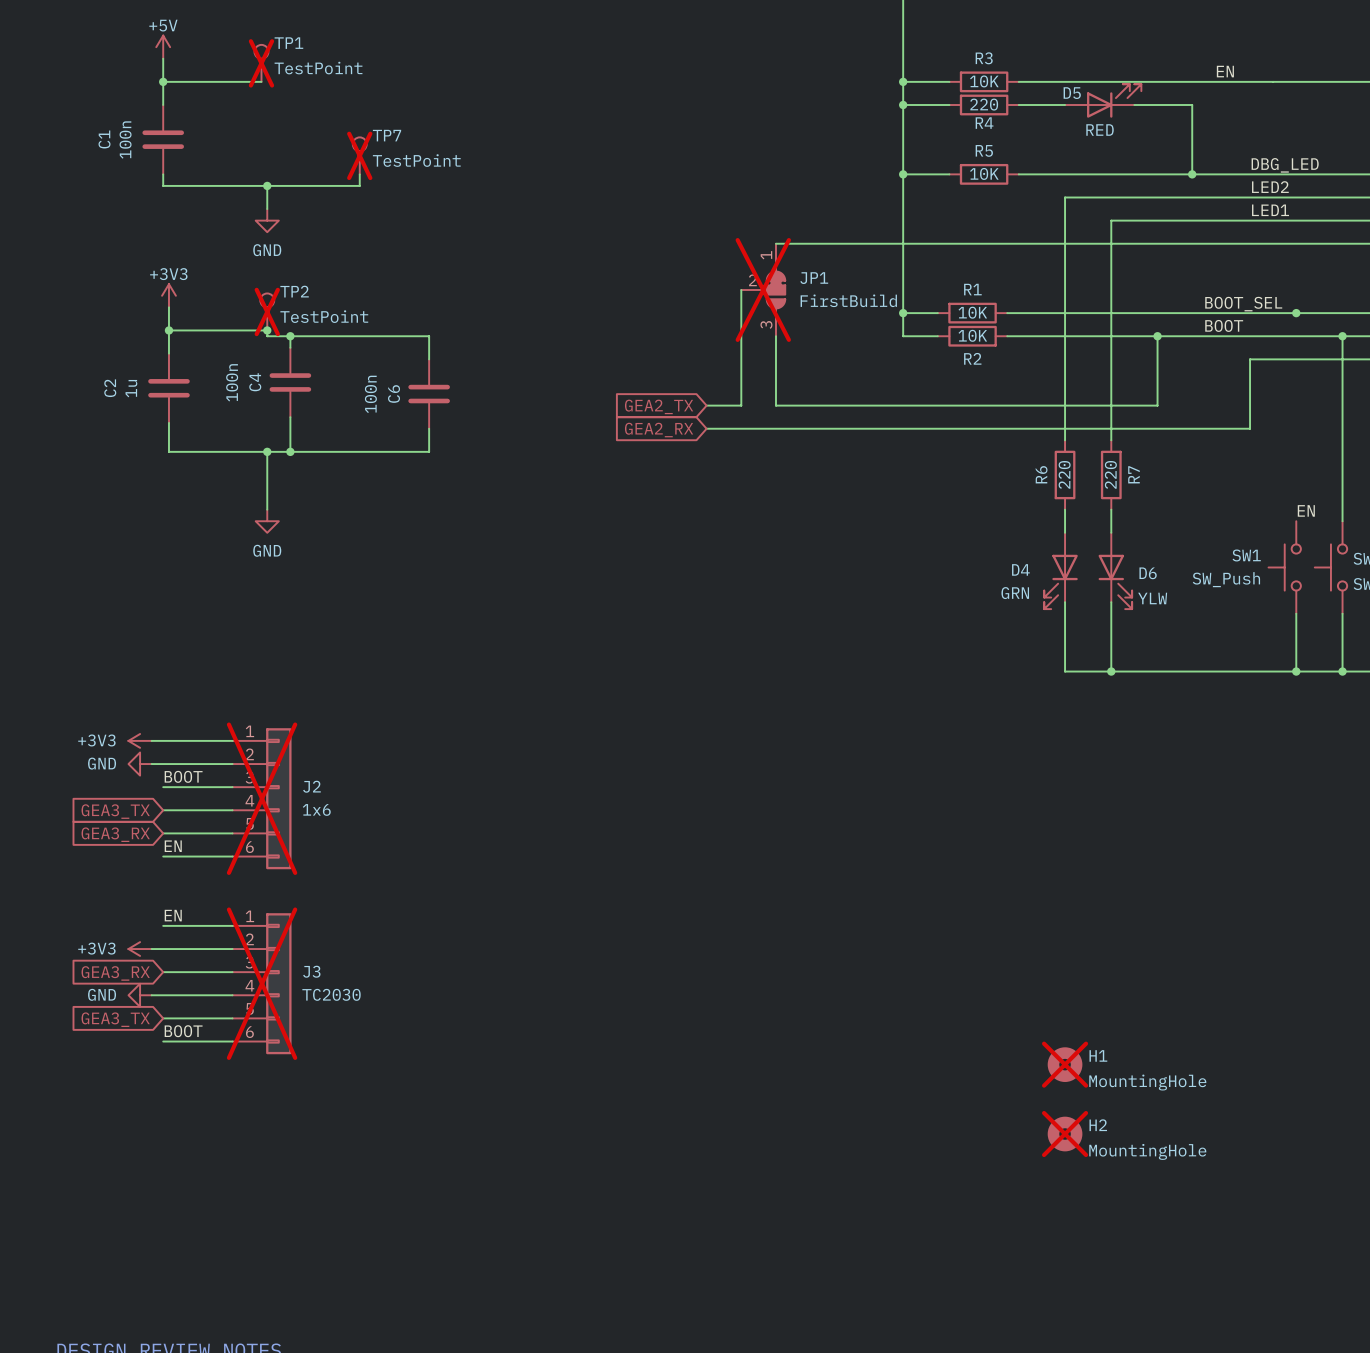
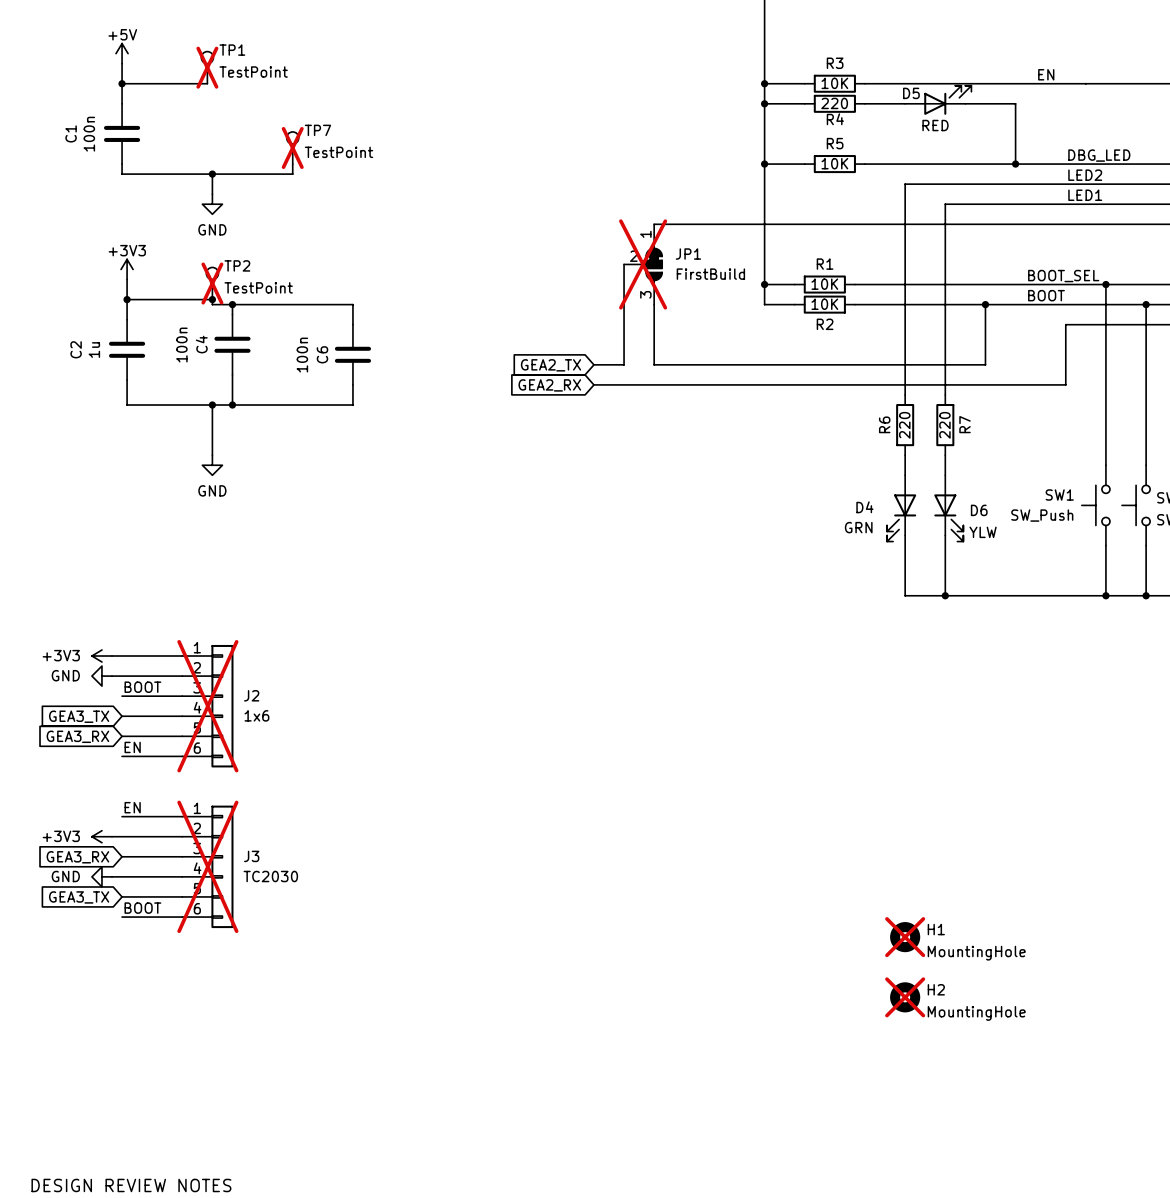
wire: none -> (1105, 284) (1105, 465)
label: EN (1306, 510) -> none

